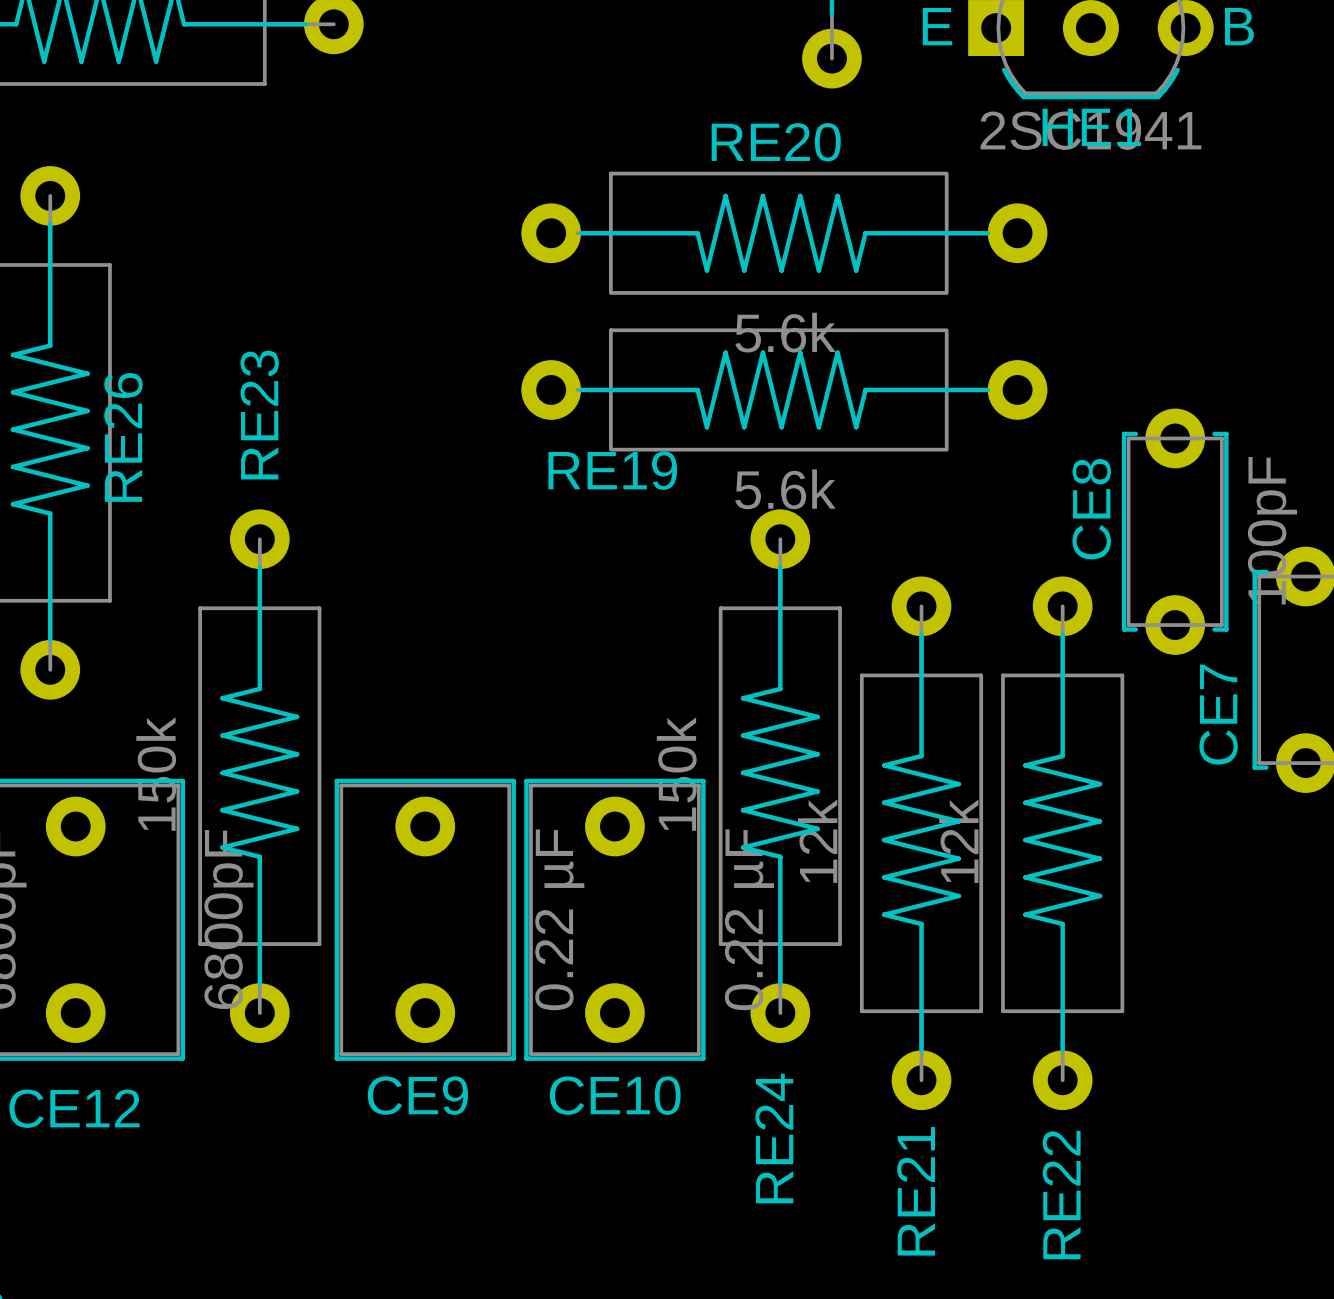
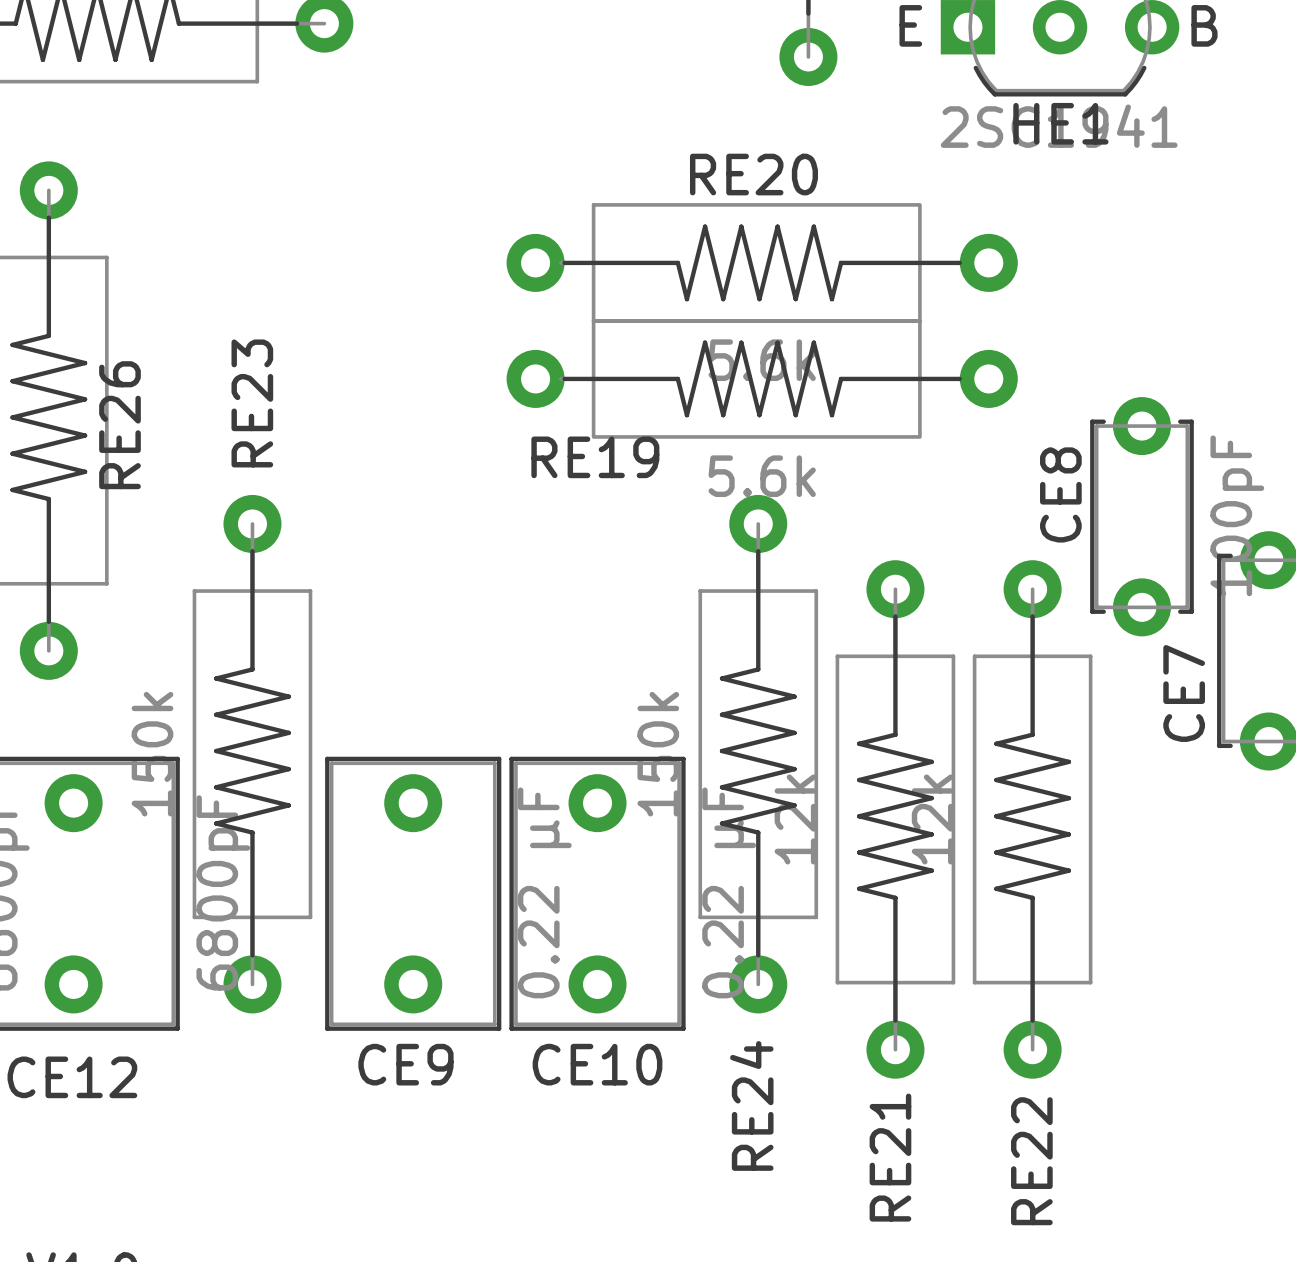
RE20 position: (784, 233) -> (762, 262)

